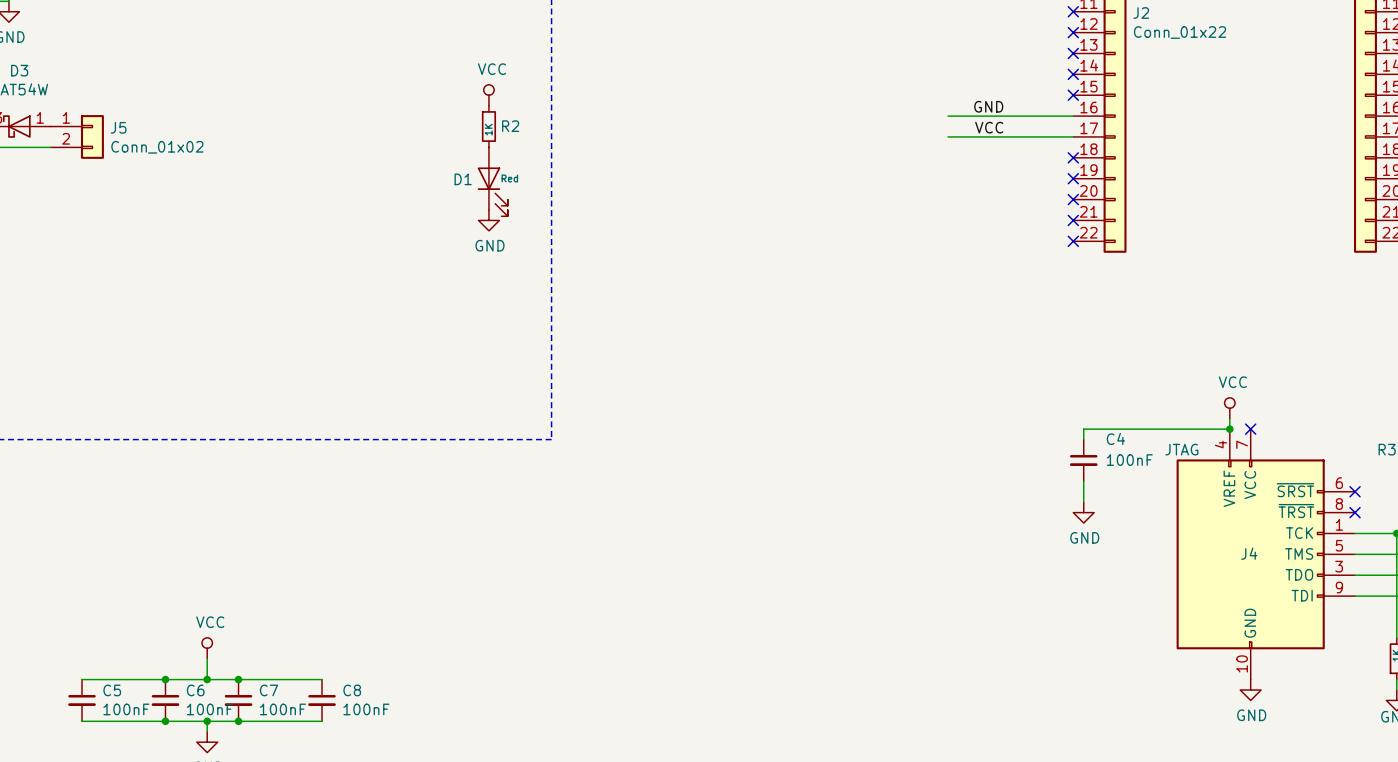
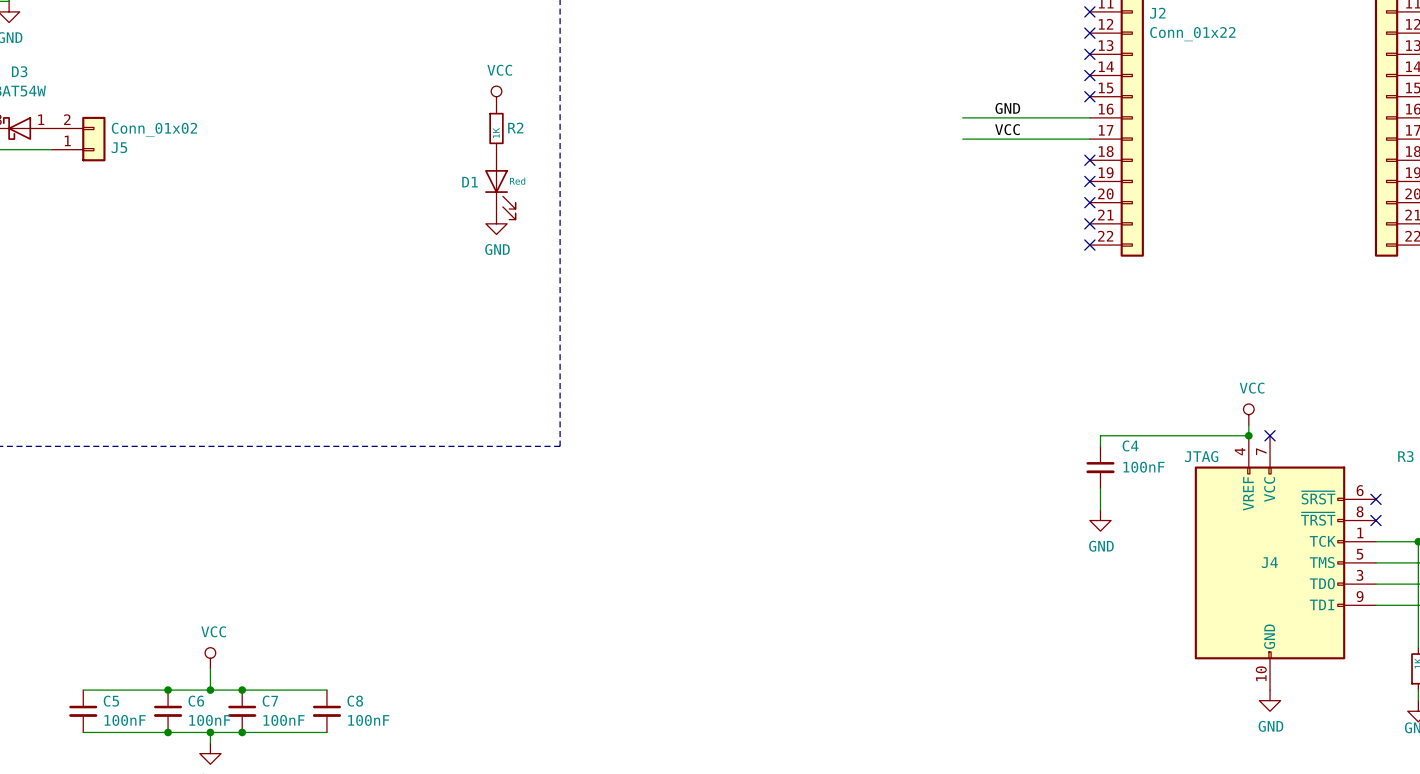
J5 flip: as is (92, 136) -> up-down (93, 139)

